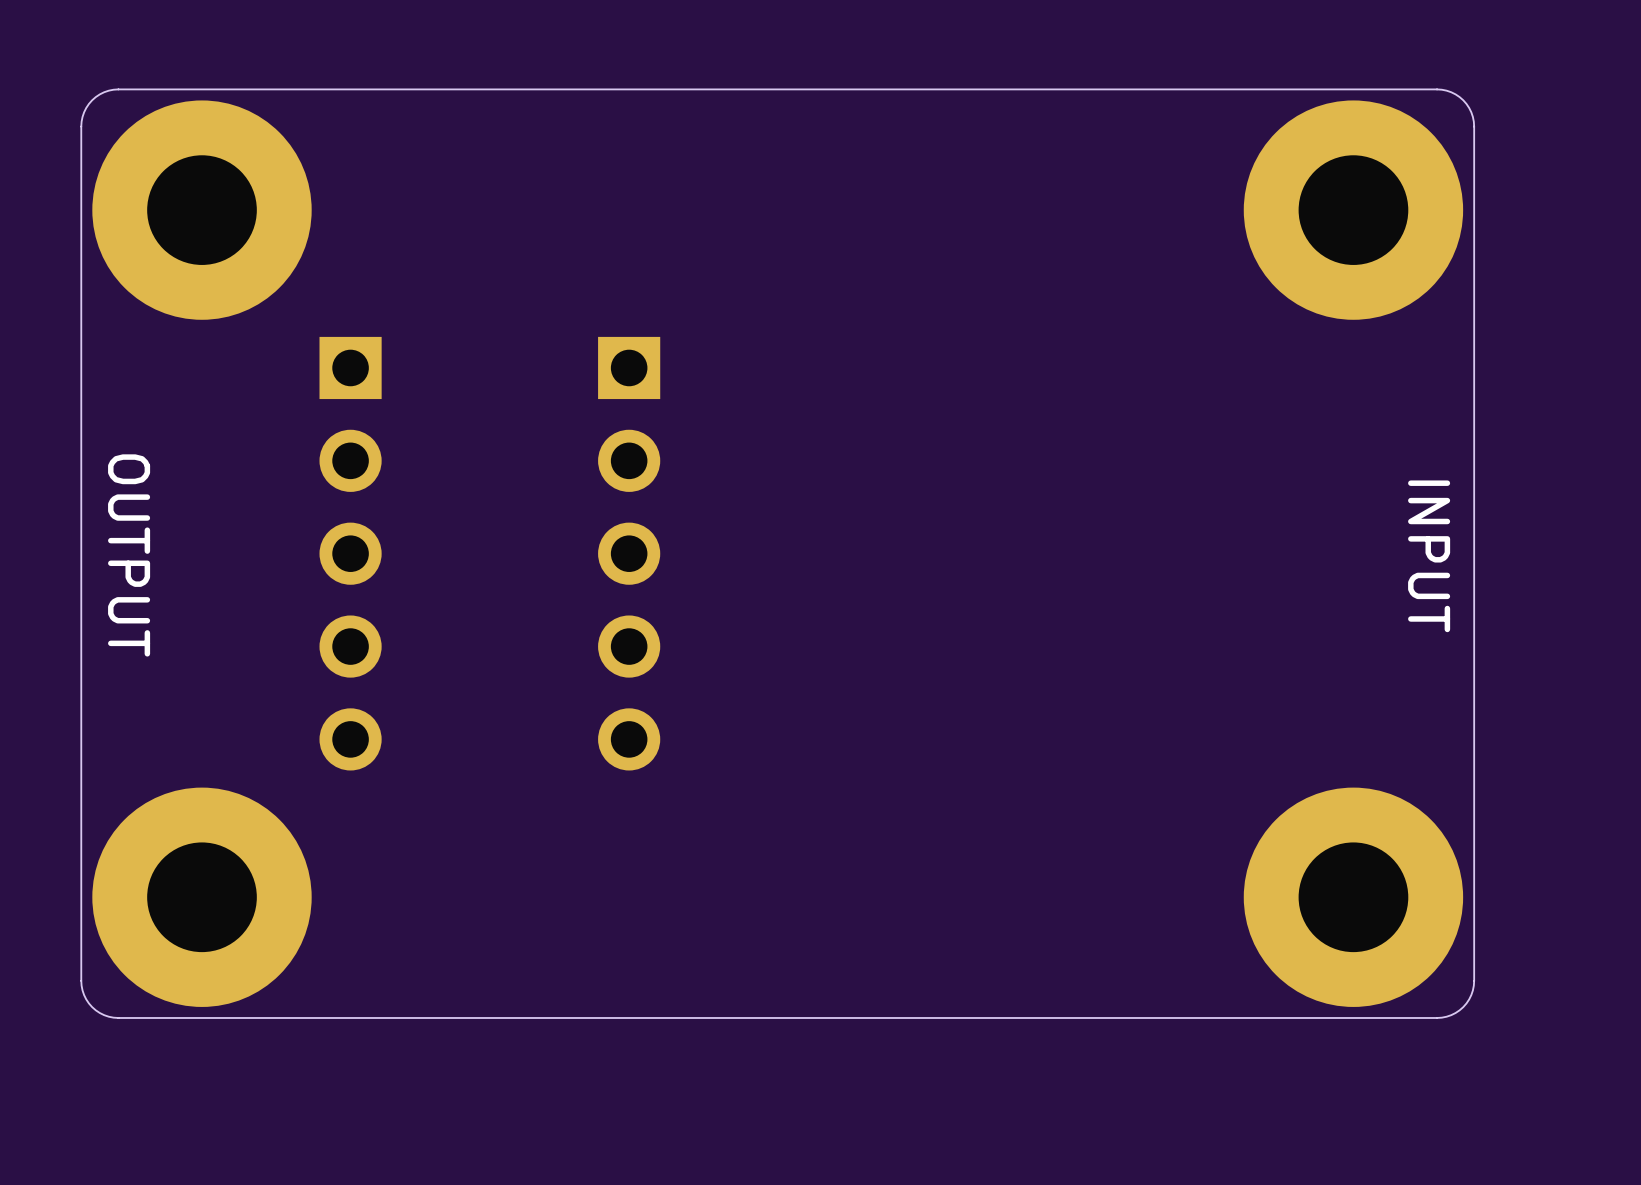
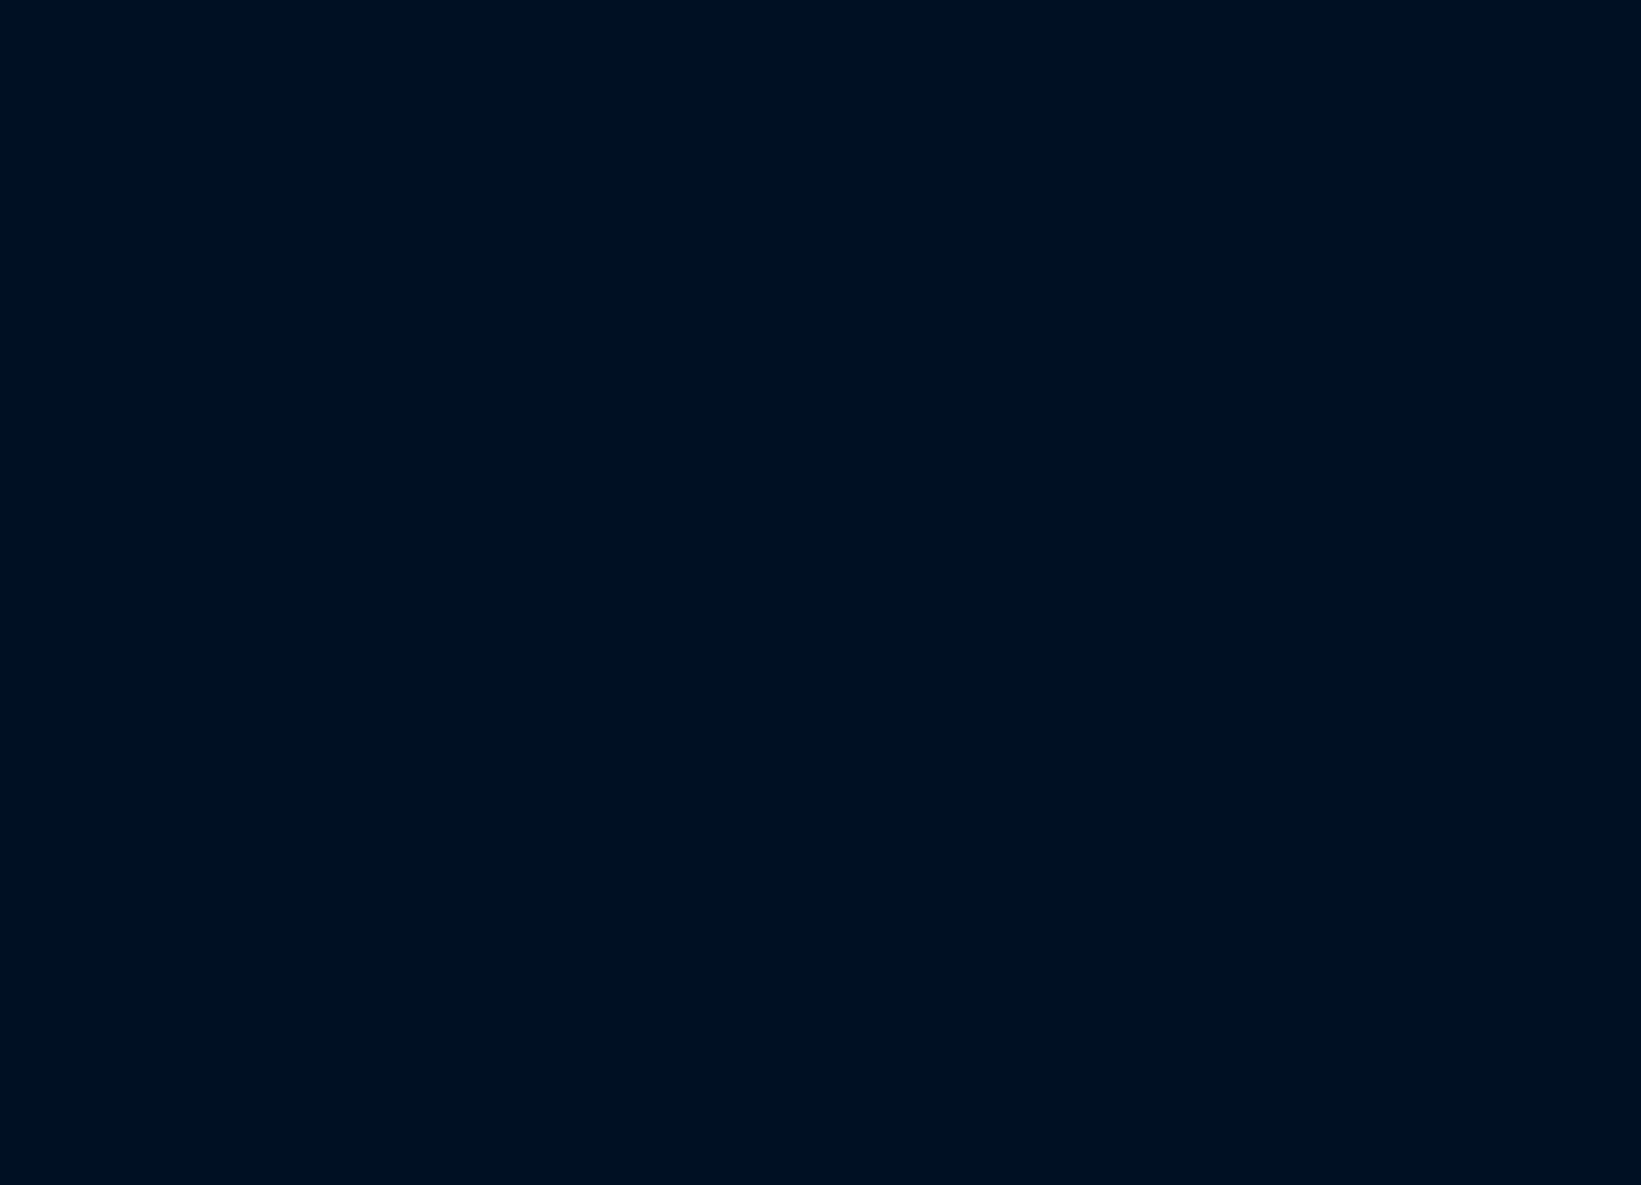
board edge: (1437, 89) (118, 89) (104, 92) (95, 97) (84, 112) (81, 126) (81, 980) (84, 995) (88, 1003) (99, 1013) (118, 1017) (1437, 1017) (1451, 1015) (1459, 1010) (1471, 995) (1474, 980) (1474, 126) (1471, 112) (1463, 100) (1451, 92) (1437, 89) -> none
part: (201, 210) -> none
part: (1353, 210) -> none
part: (350, 553) -> none
part: (629, 553) -> none
text: OUTPUT (129, 555) -> none
text: INPUT (1429, 556) -> none
part: (201, 897) -> none
part: (1353, 897) -> none

